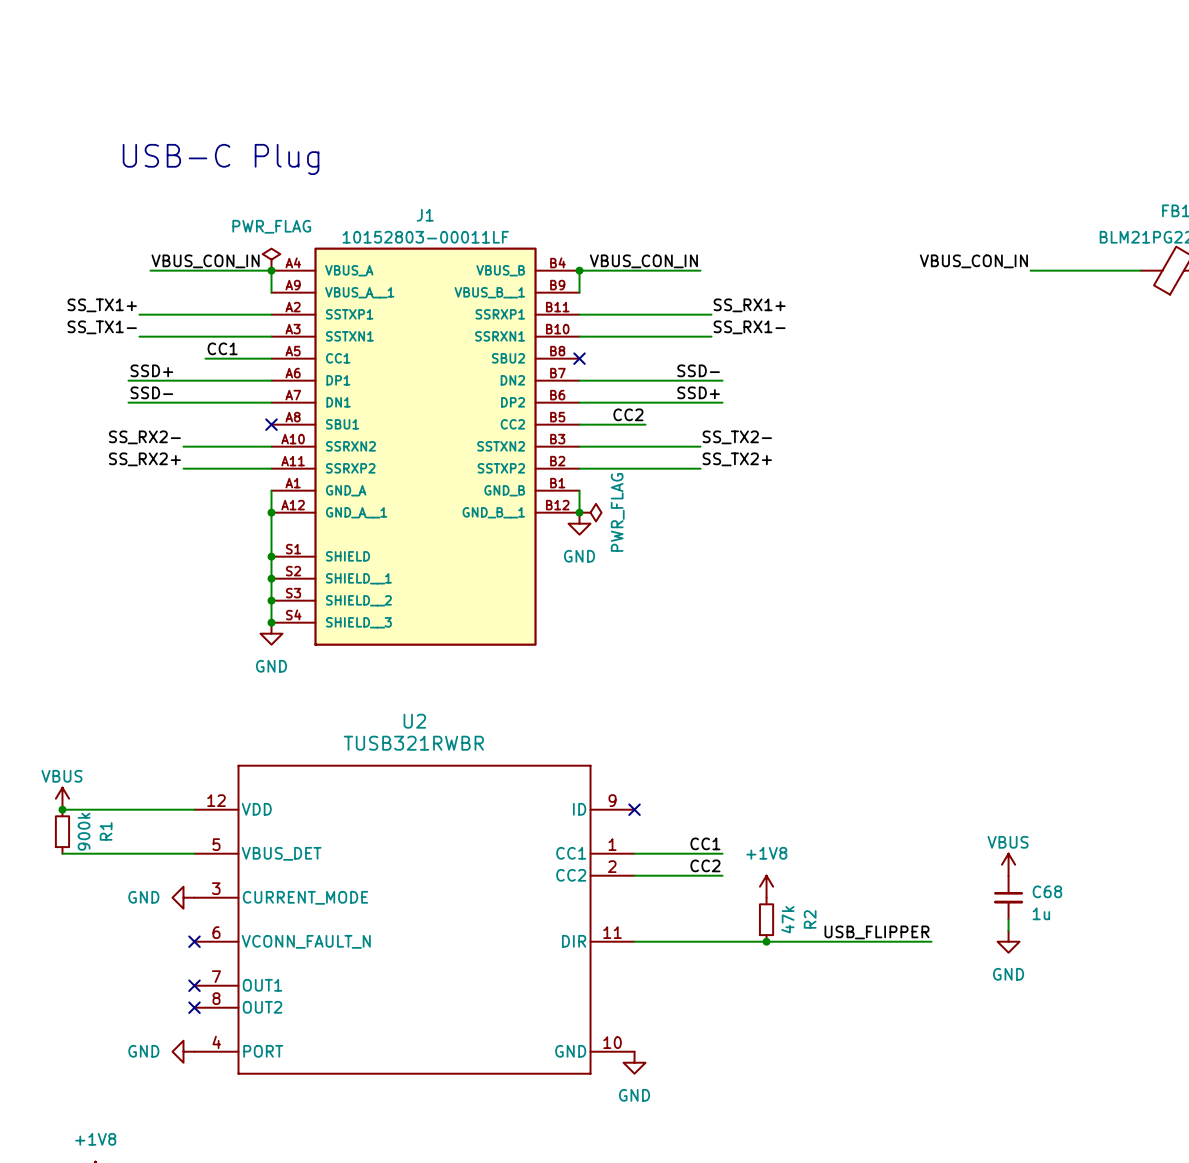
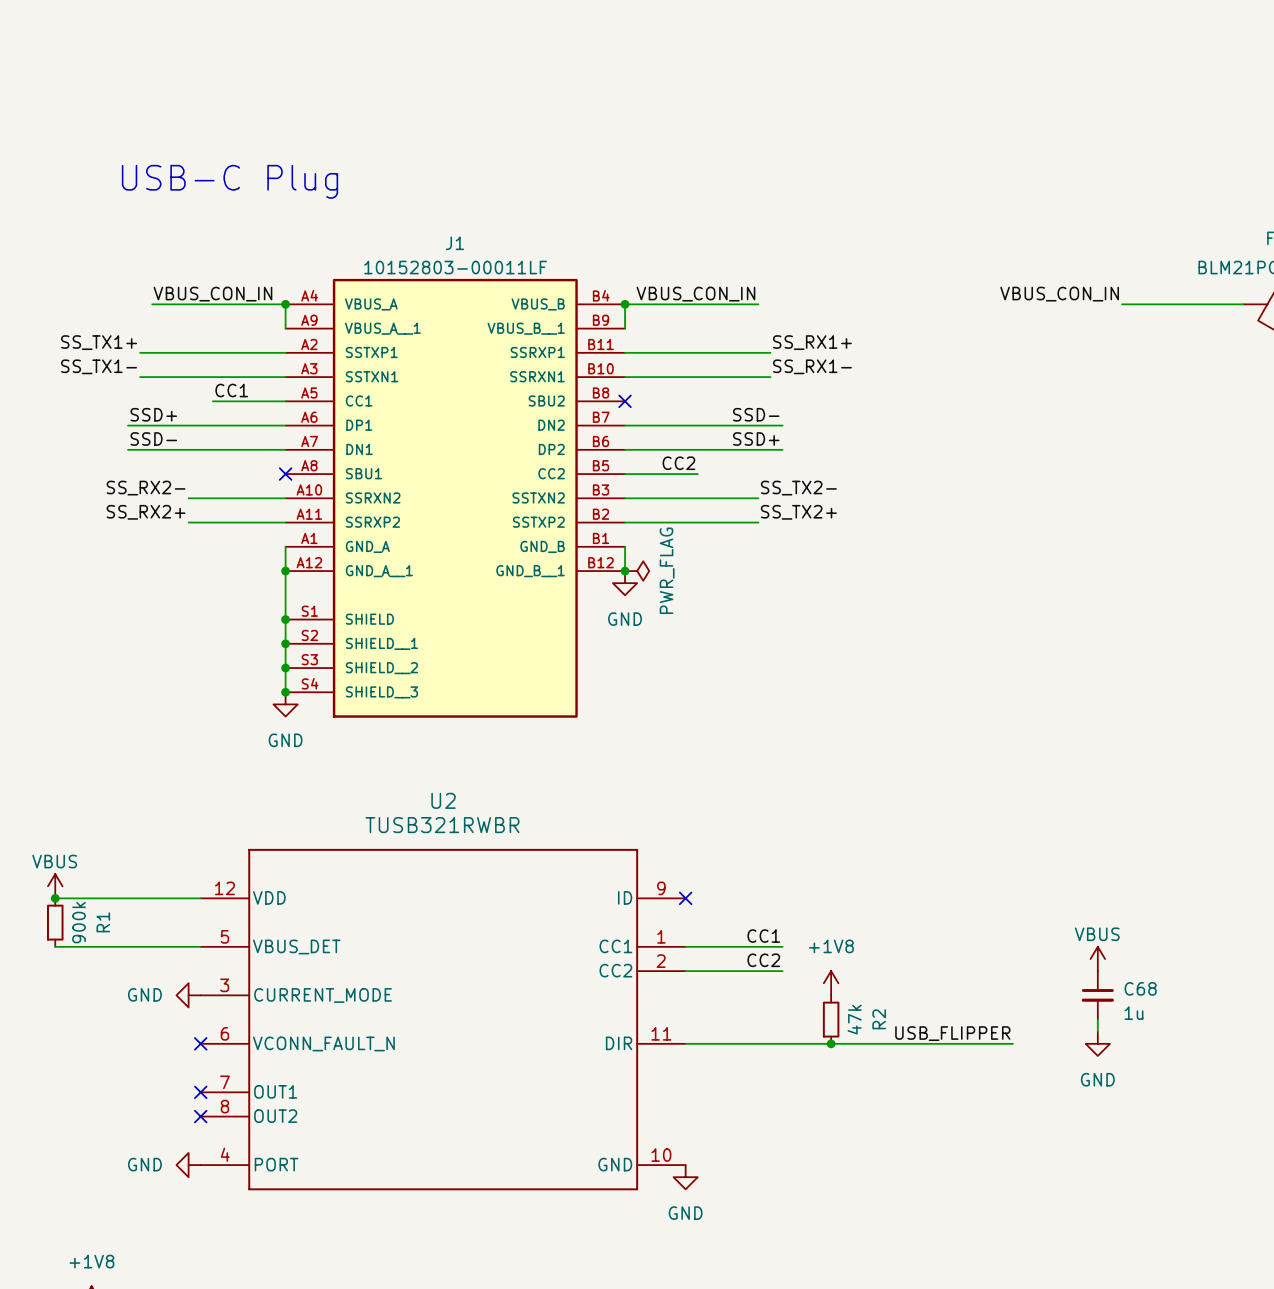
power symbol: PWR_FLAG (271, 259) -> none

